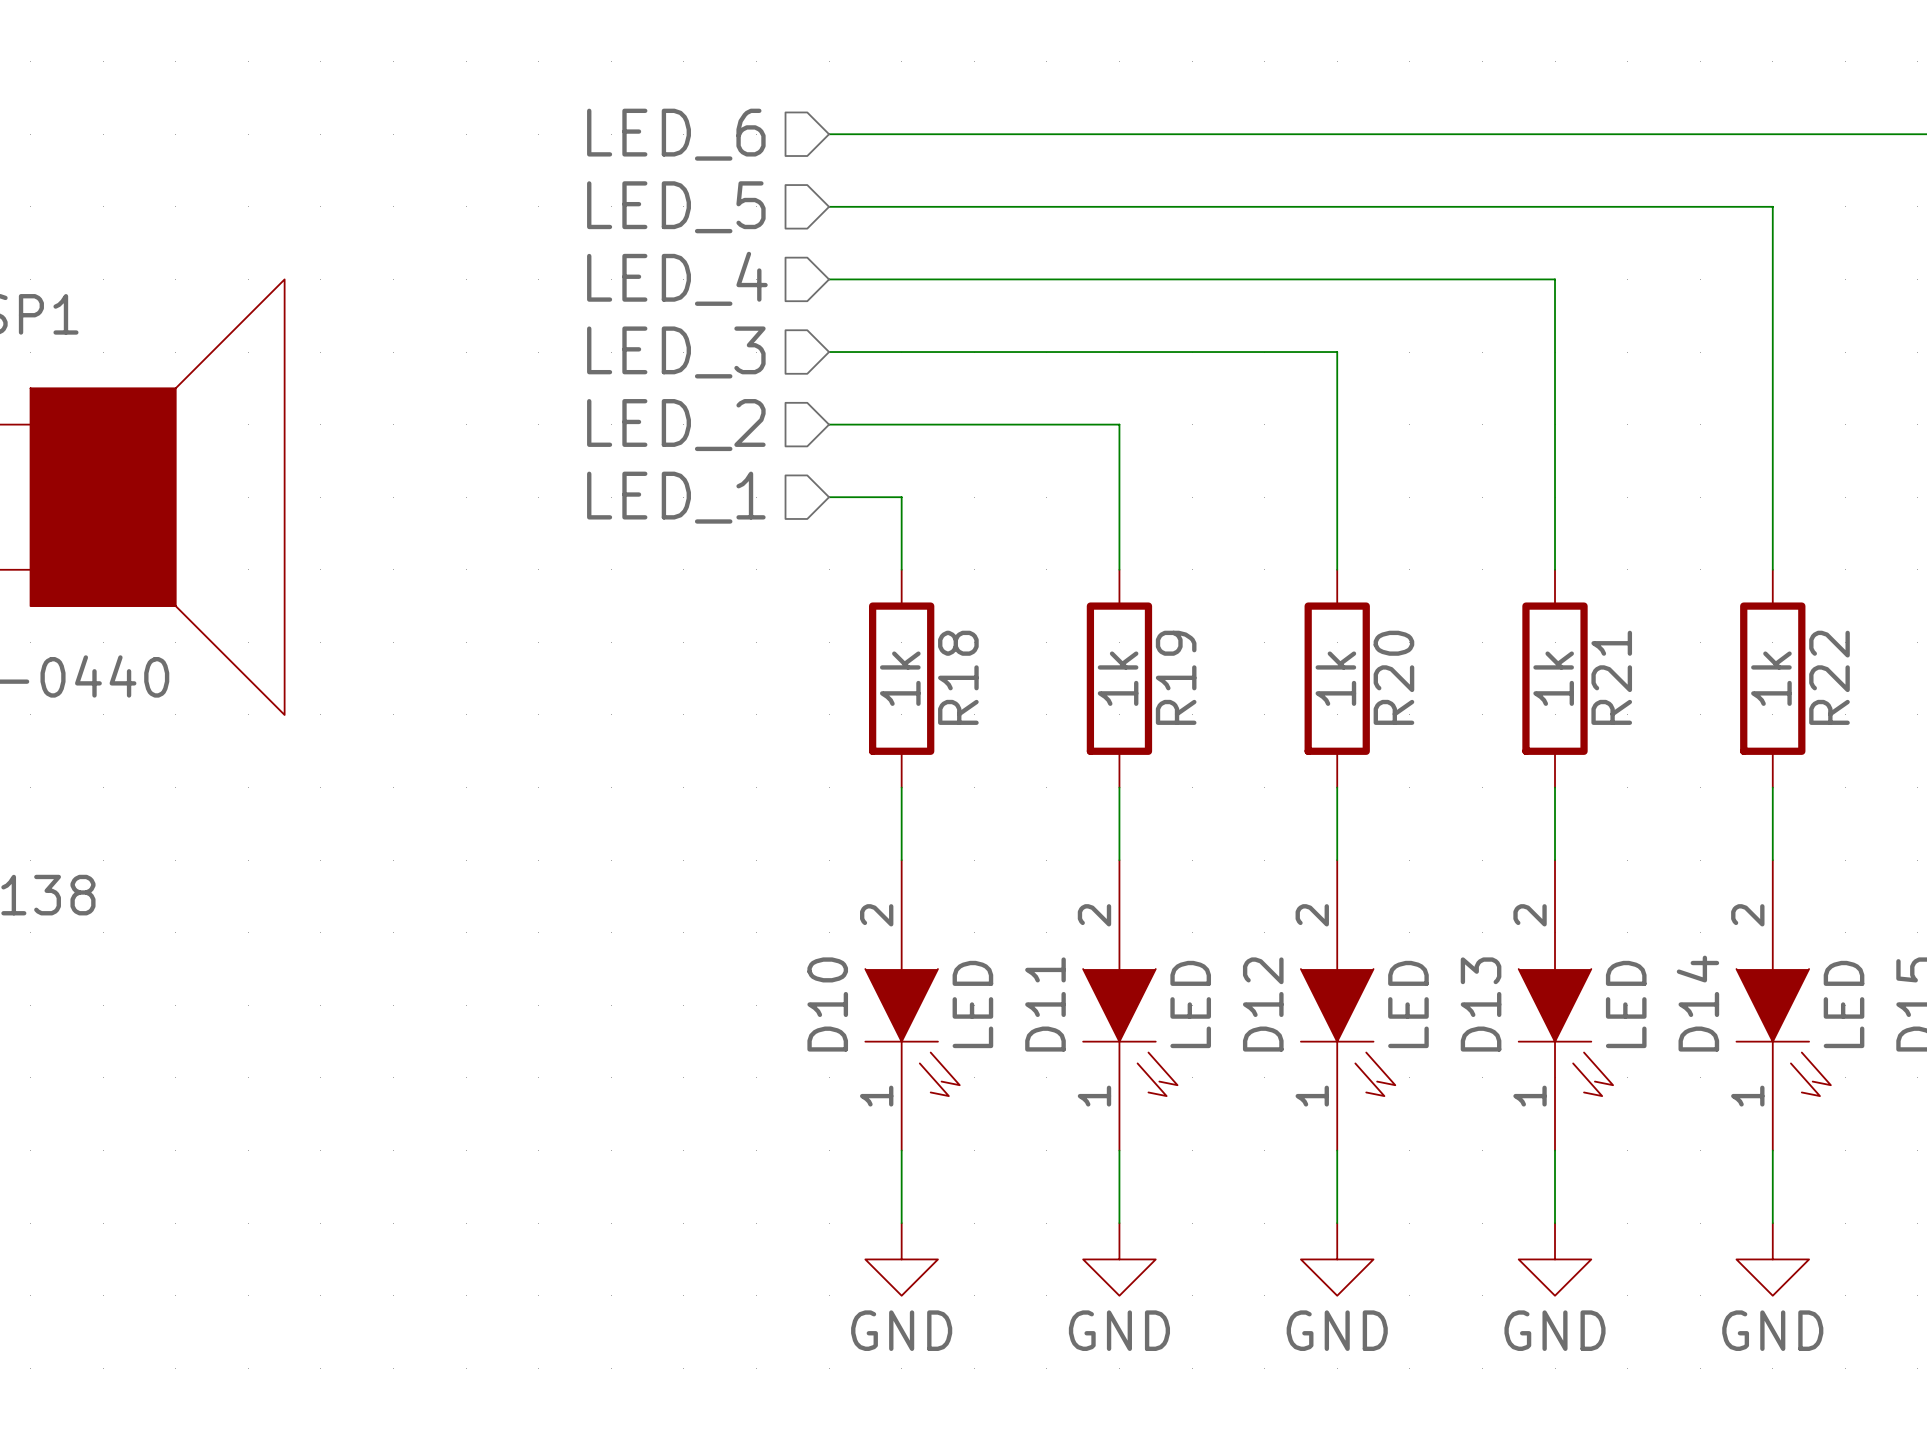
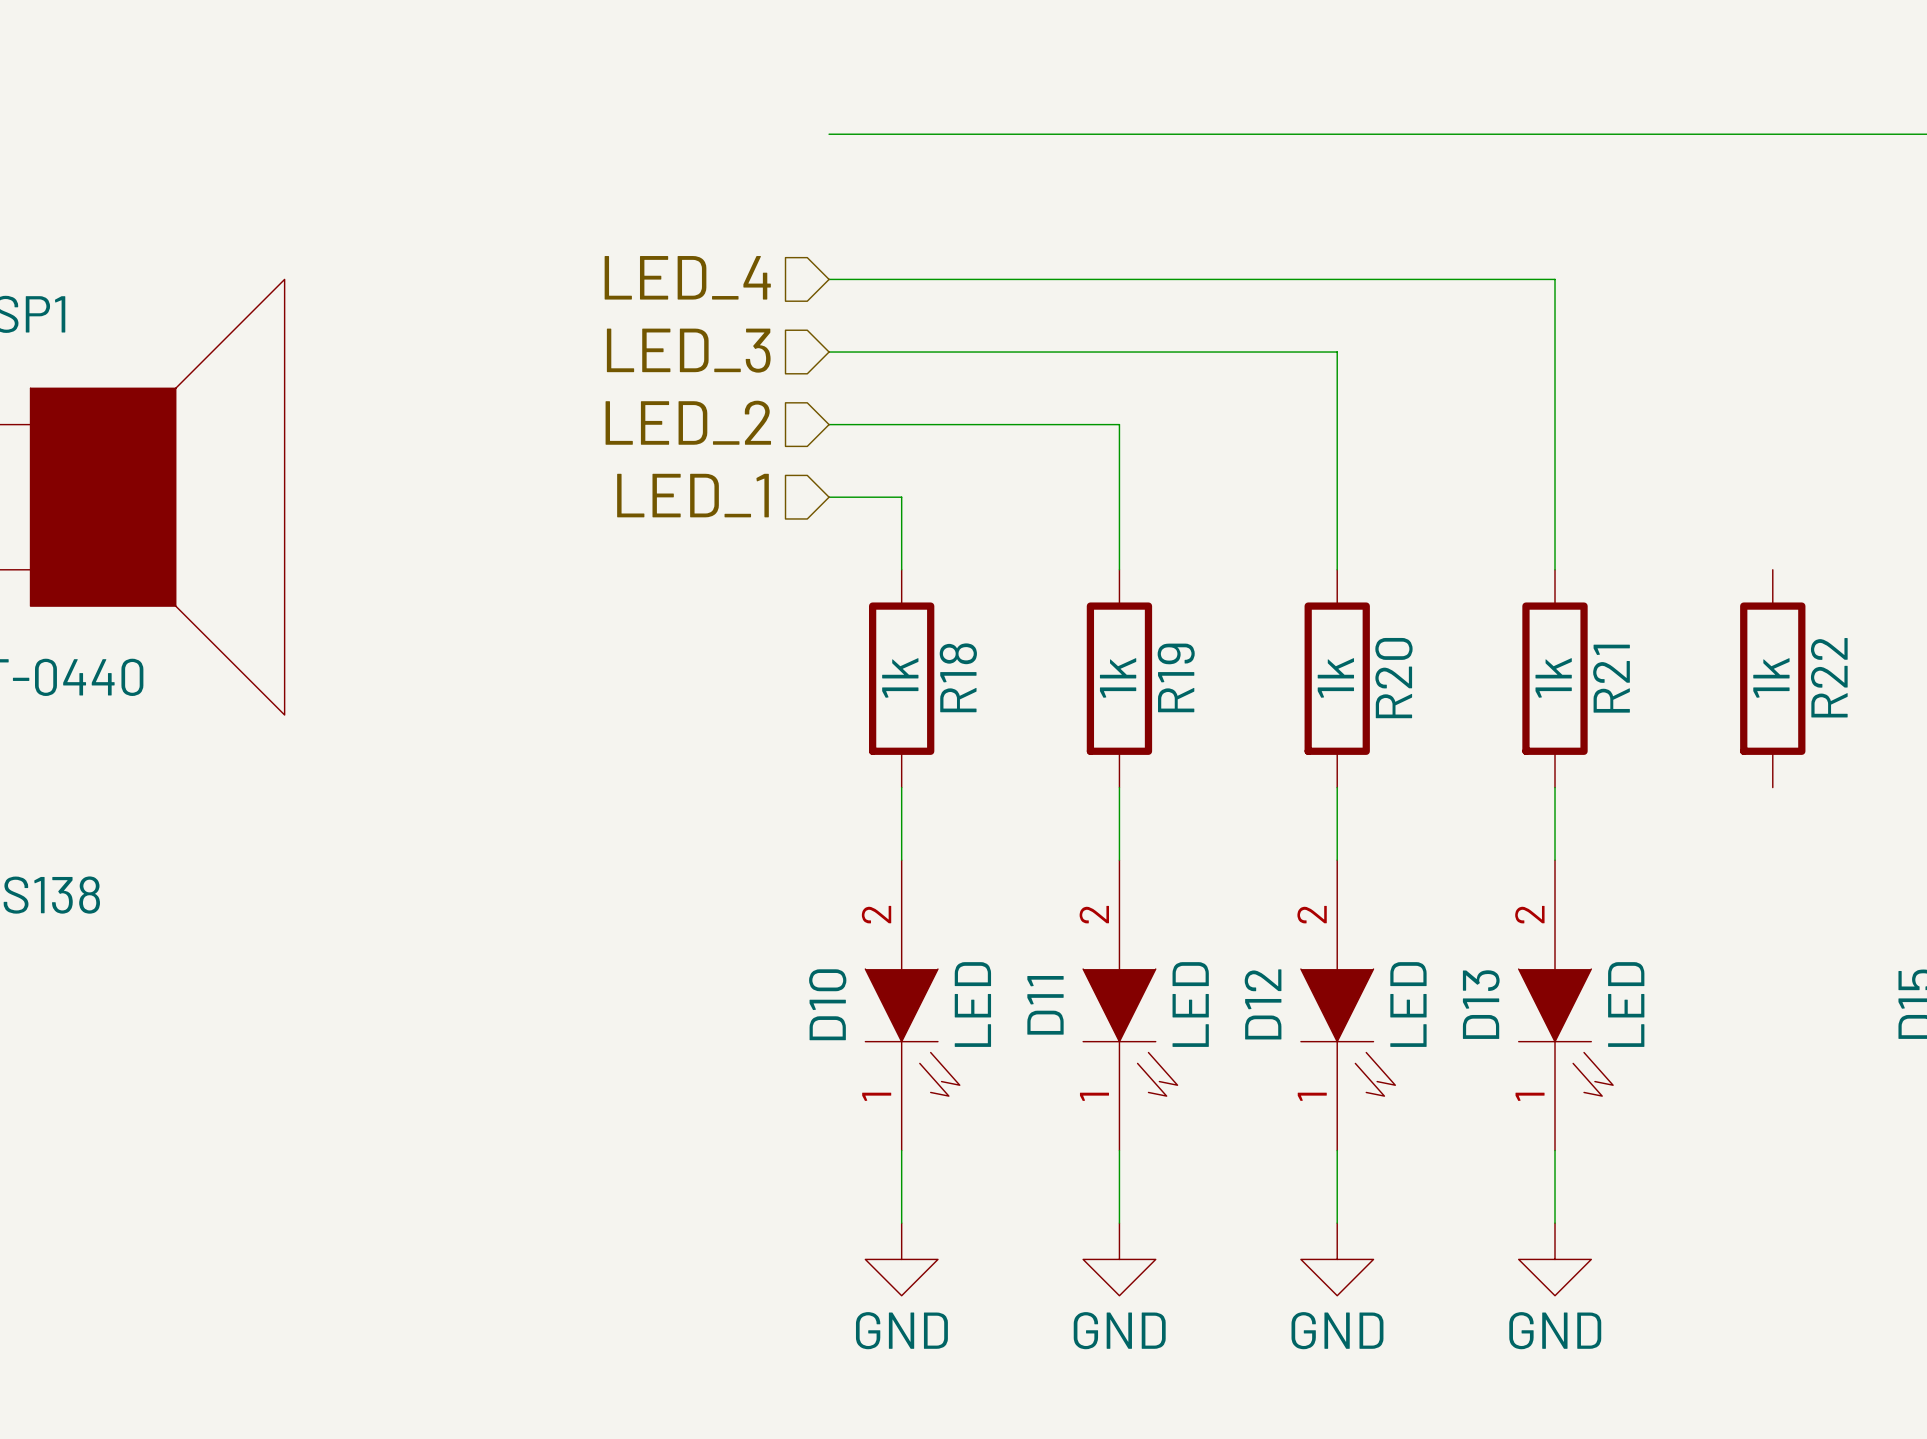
hierarchical label: LED_6 (676, 134) -> none
wire: (829, 206) (1772, 206) (1772, 569) -> none
hierarchical label: LED_5 (676, 207) -> none
wire: (1772, 787) (1772, 860) -> none
D14: LED (1783, 1005) -> none
wire: (1772, 1150) (1772, 1223) -> none
power symbol: GND (1772, 1259) -> none

